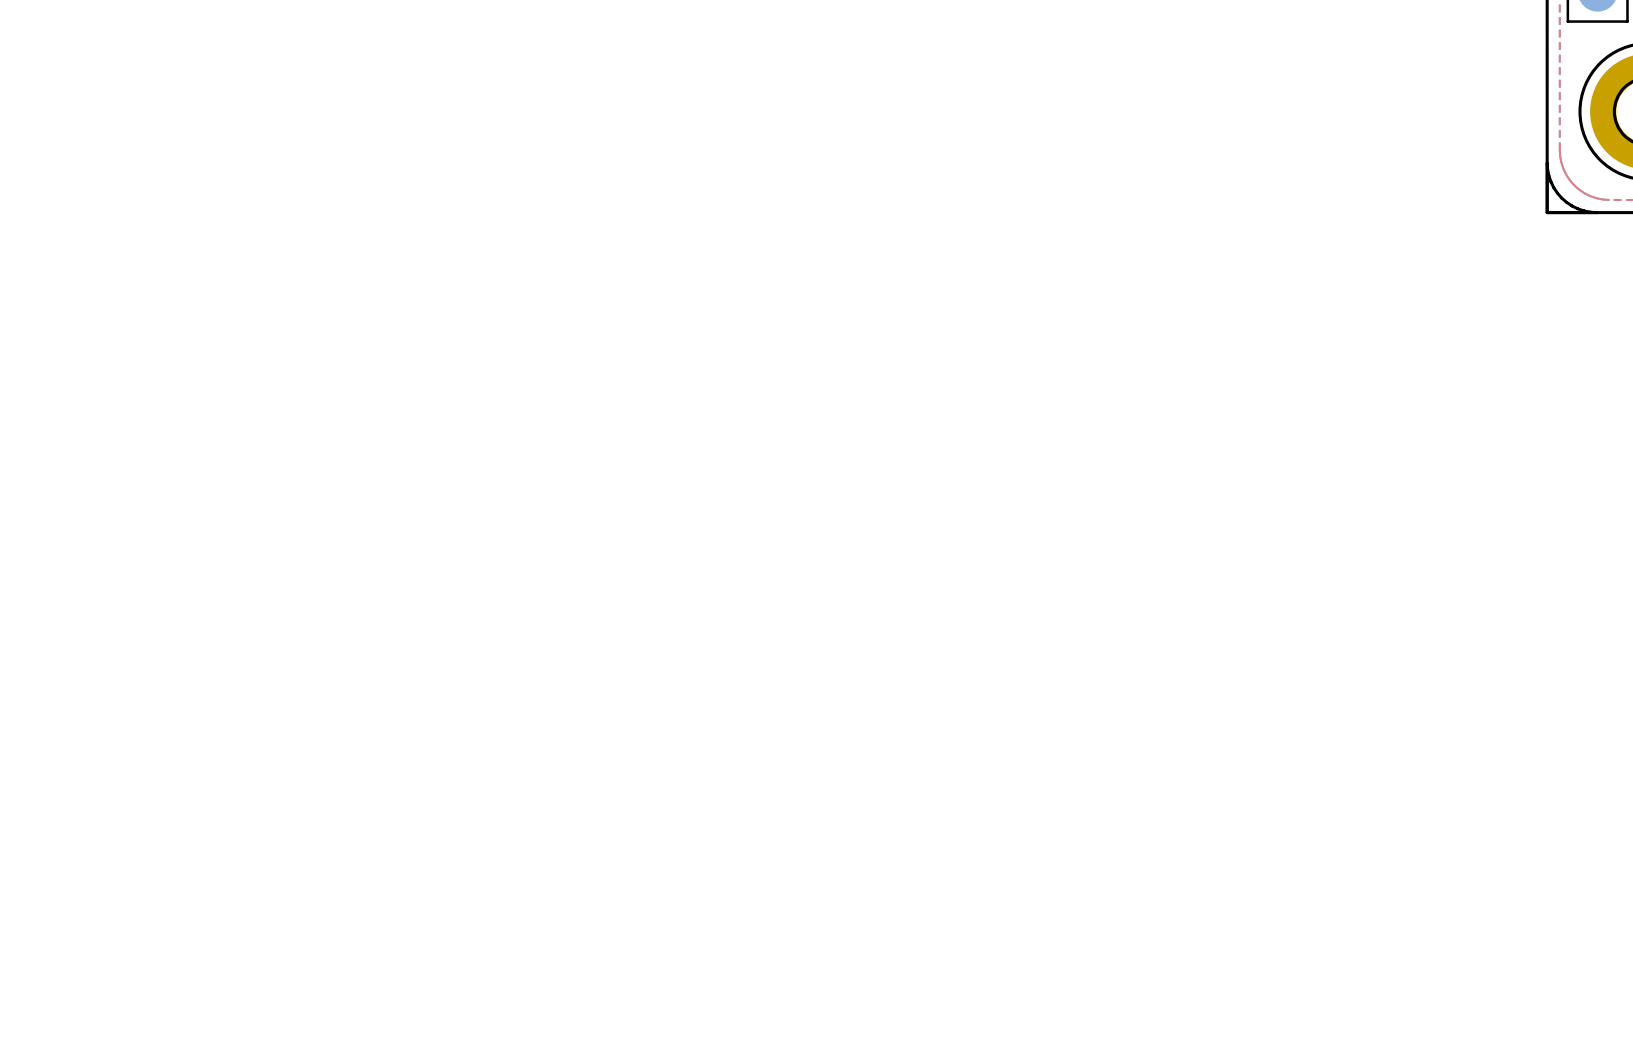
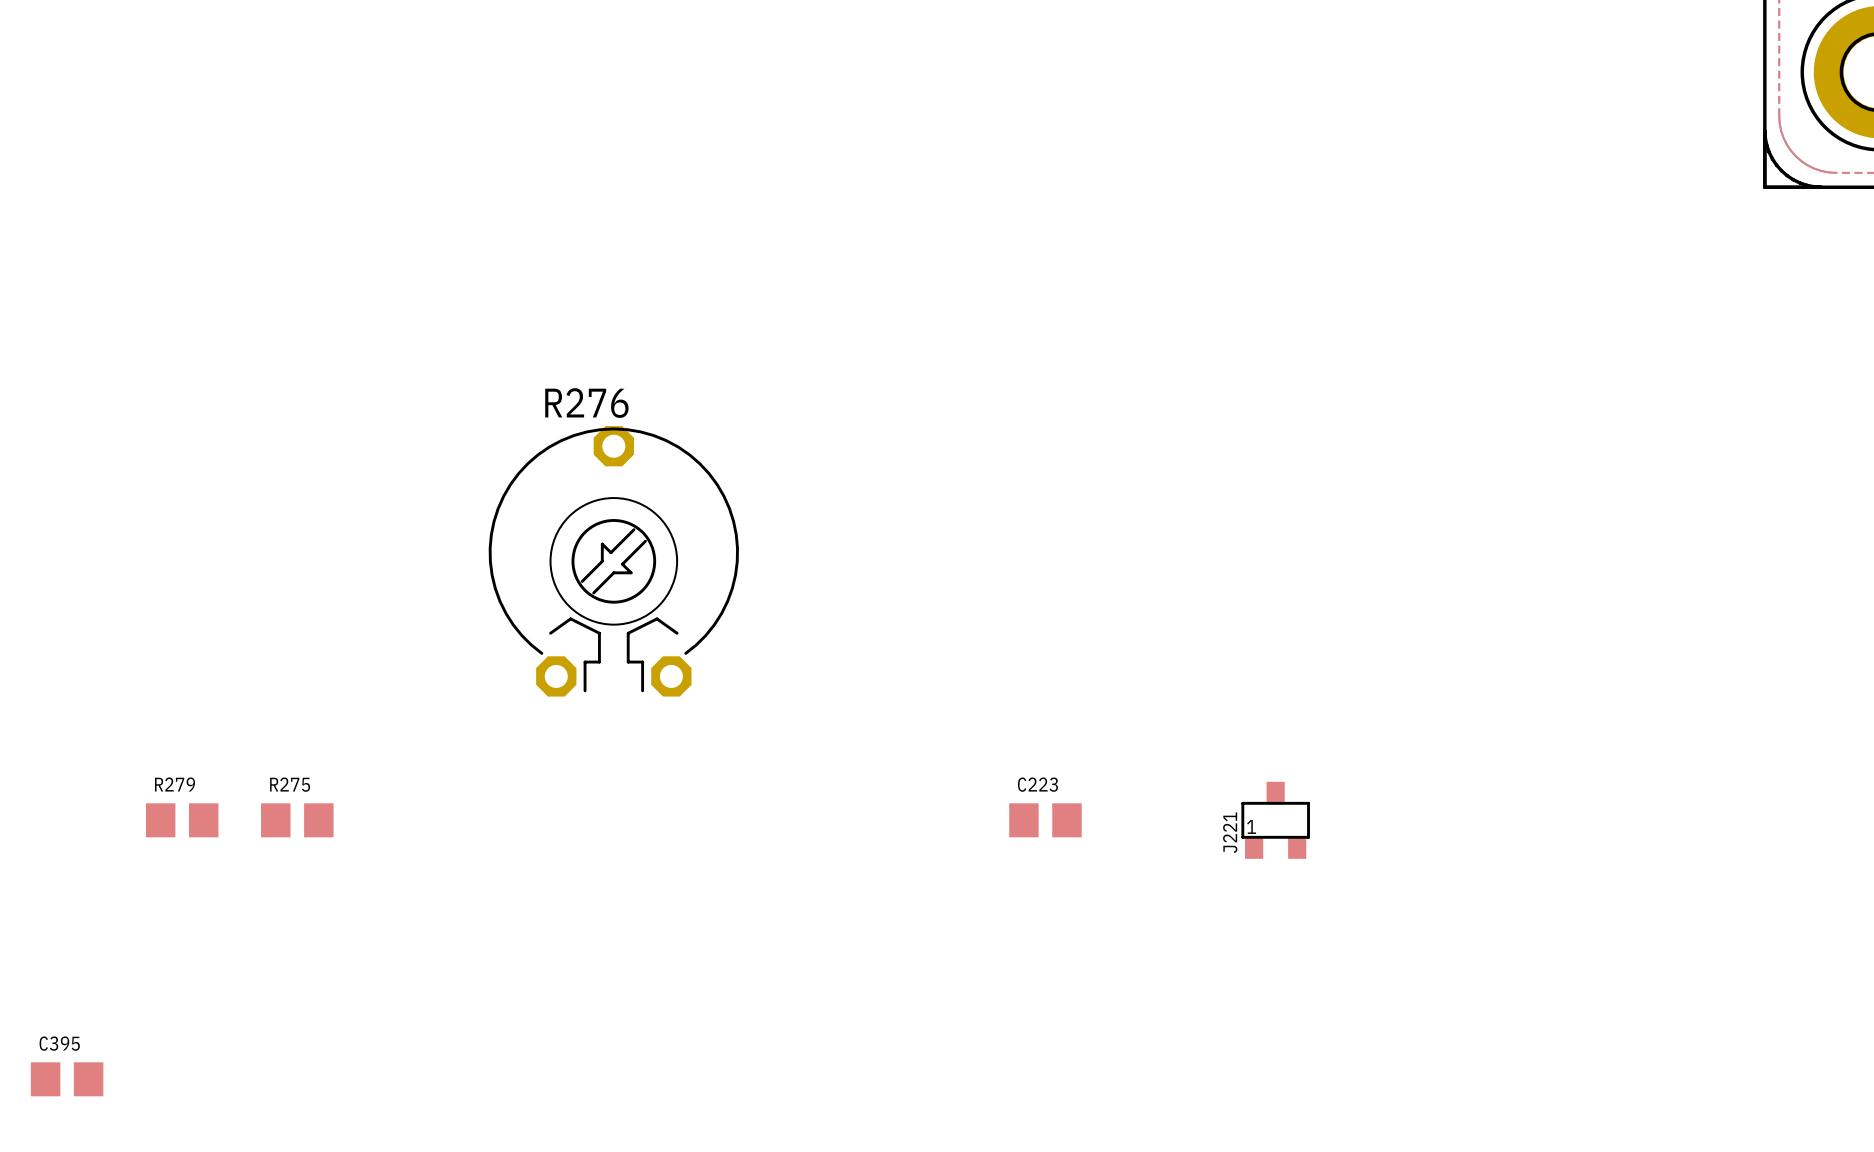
R276: none -> (613, 561)
R279: none -> (182, 820)
R275: none -> (297, 820)
C223: none -> (1045, 820)
J221: none -> (1275, 820)
C395: none -> (67, 1079)

